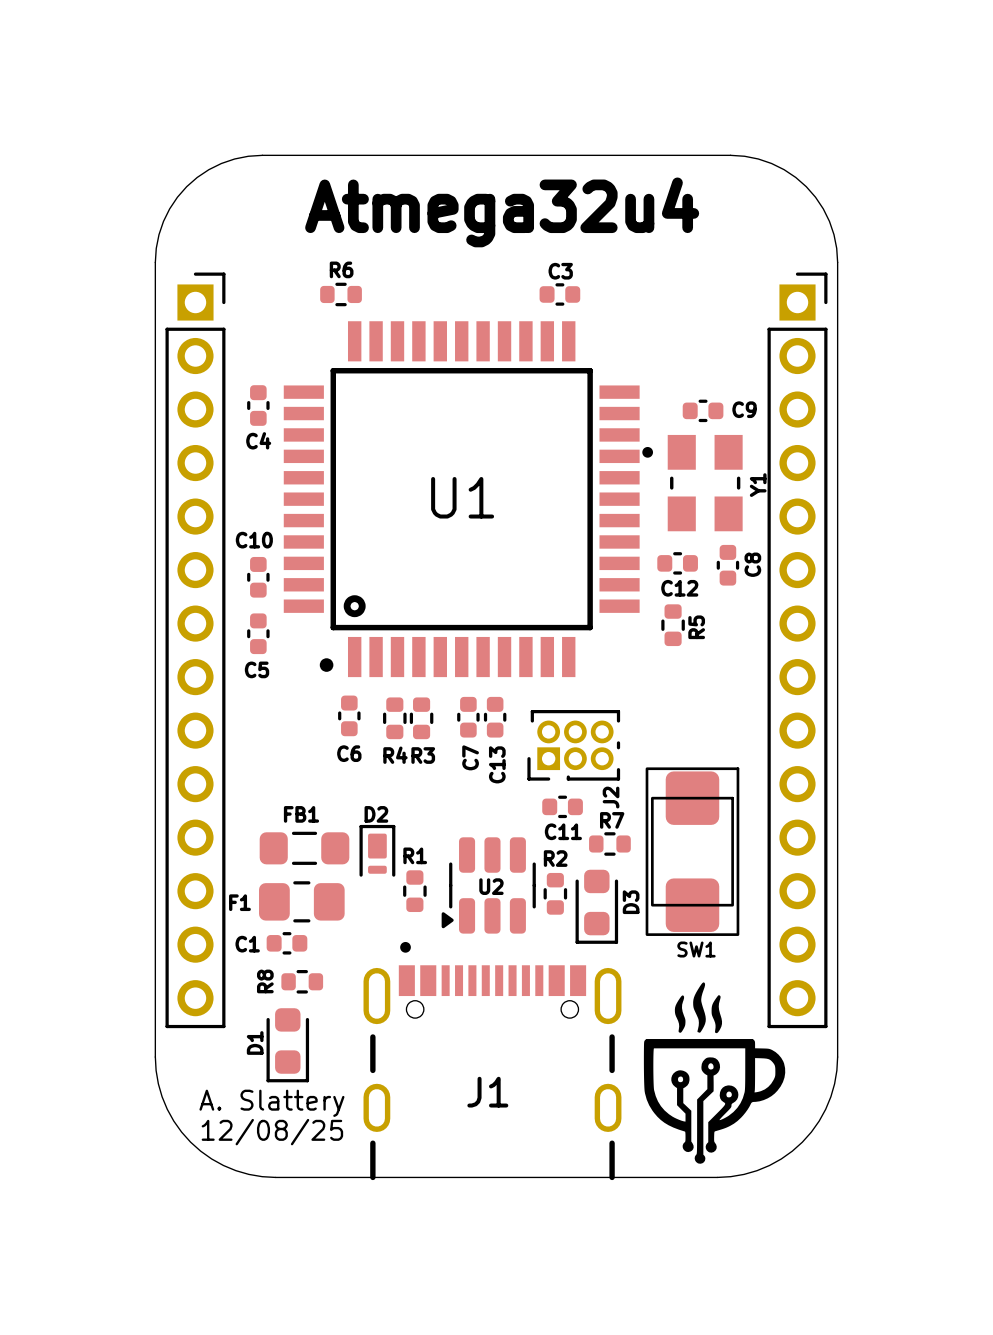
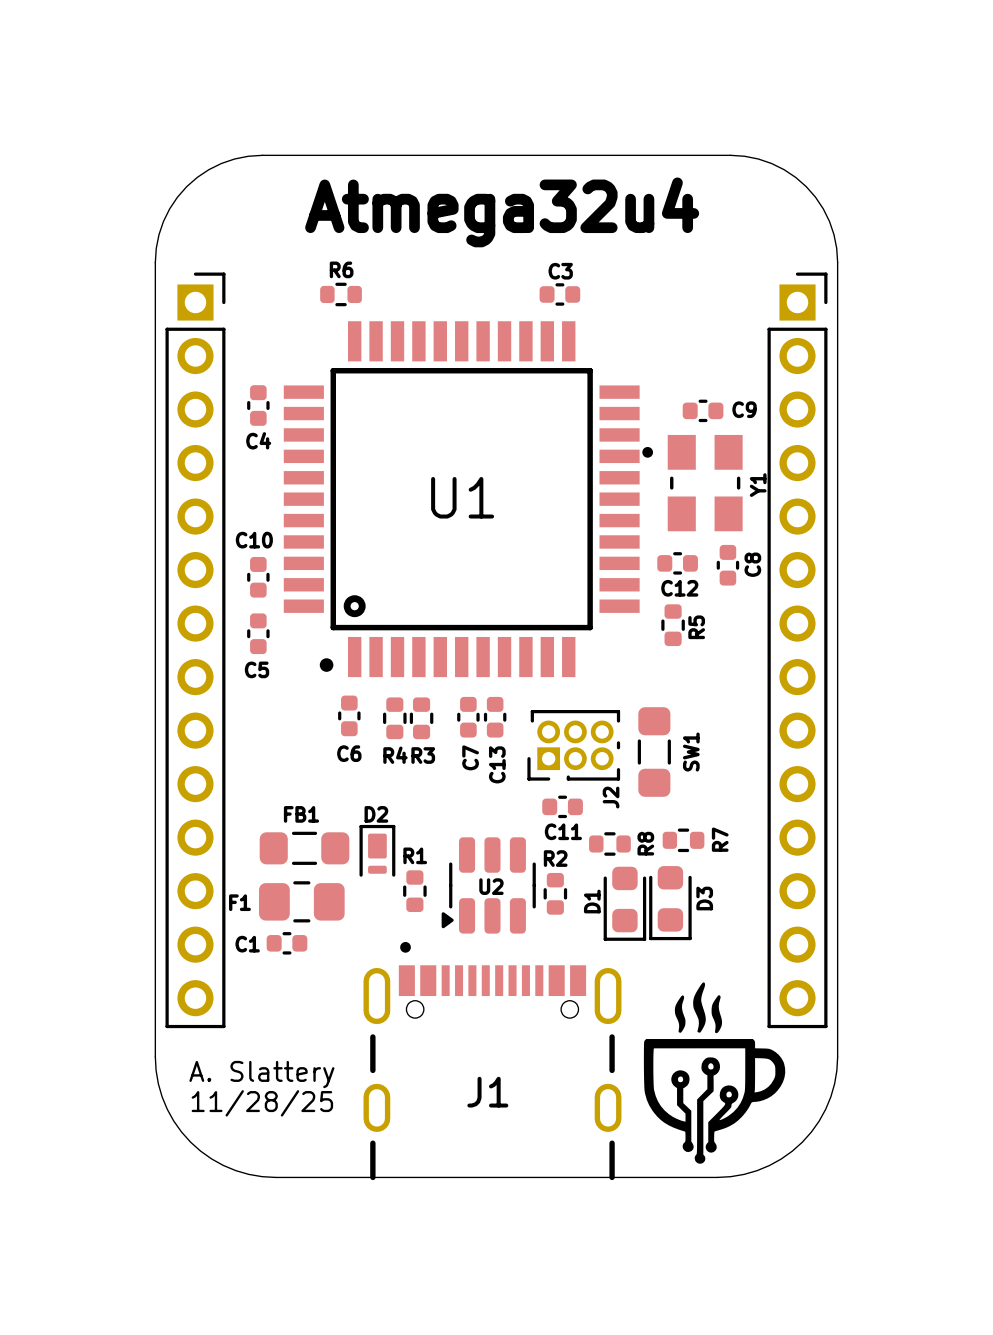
SW1 footprint: [645, 767, 740, 936] -> [637, 707, 671, 797]
R7 name: R7 (612, 820) -> R8 (645, 843)
R7: none -> (683, 840)
D3 position: (596, 906) -> (670, 903)
SW1 name position: SW1 (696, 949) -> SW1 (691, 752)
R8: (302, 981) -> none
D1 position: (287, 1045) -> (624, 903)
text: none -> A. Slattery (261, 1074)
text: A. Slattery (271, 1103) -> 11/28/25 (262, 1103)
text: 12/08/25 (272, 1132) -> none

